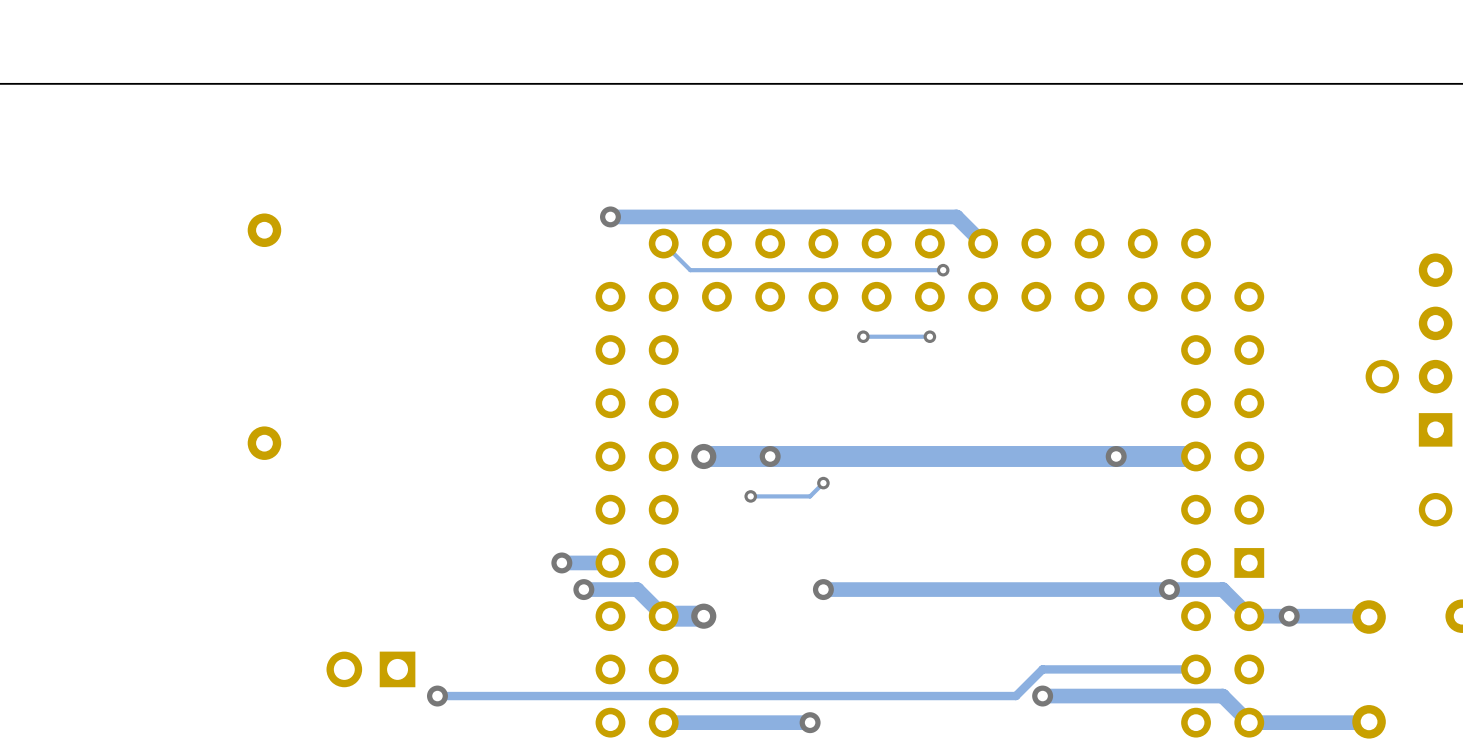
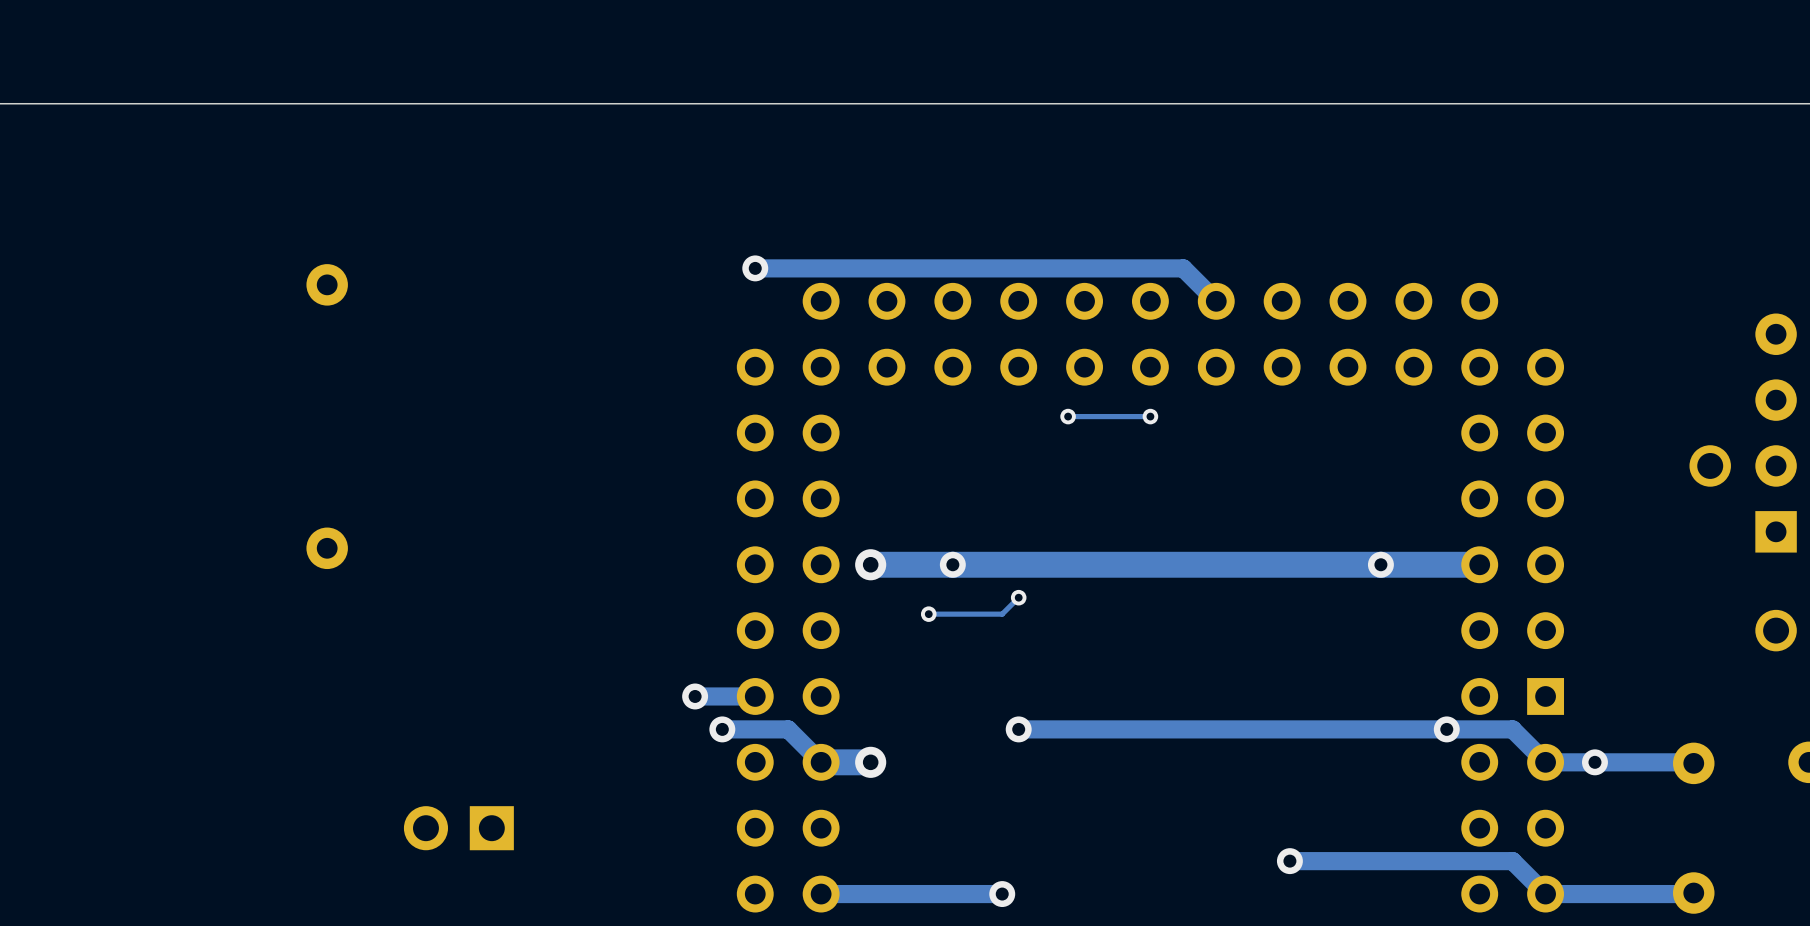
track: (663, 243) (690, 270) (943, 270) -> none
via: (943, 270) -> none
track: (1196, 669) (1042, 669) (1015, 696) (437, 696) -> none
via: (437, 696) -> none

